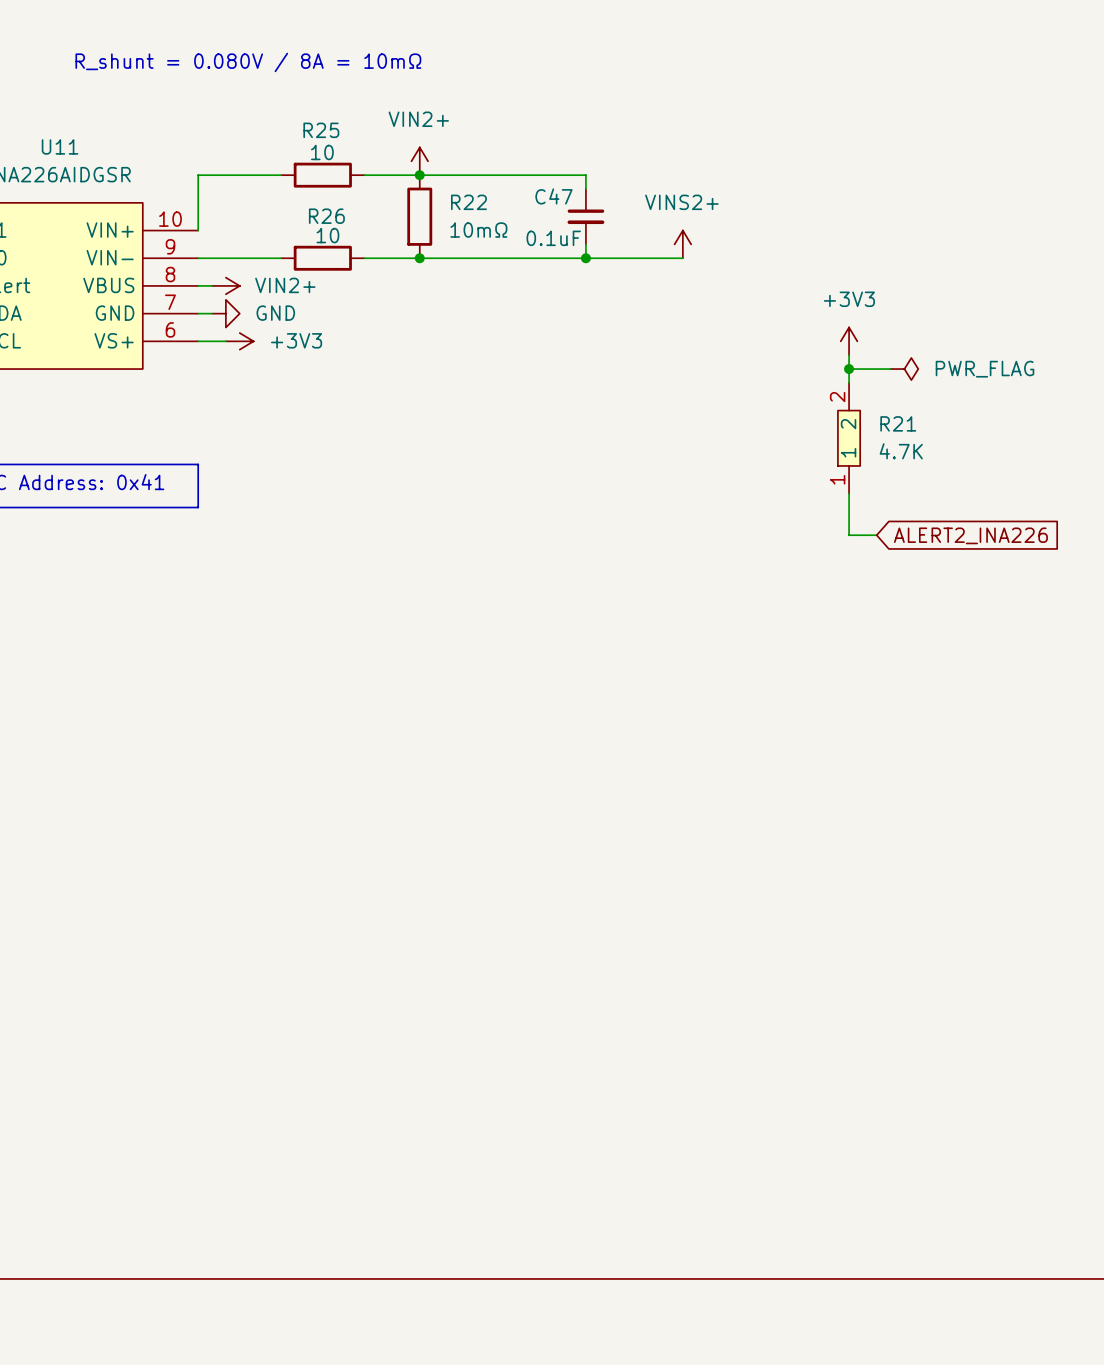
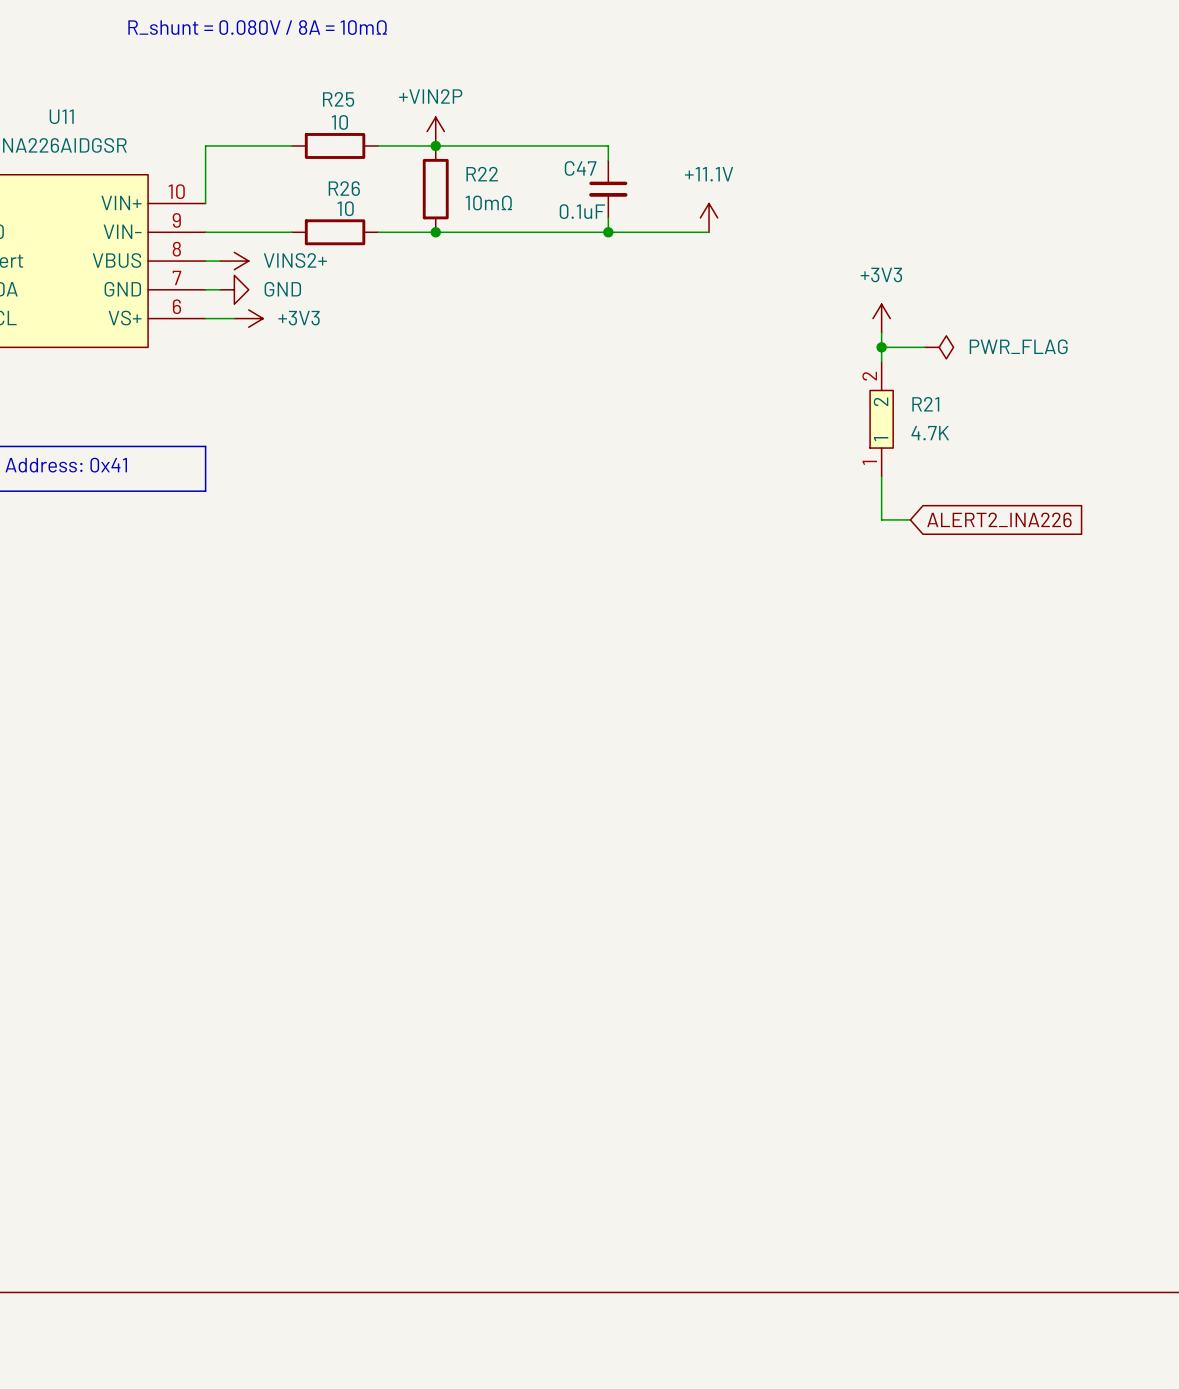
power symbol: VIN2+ (419, 161) -> +VIN2P (435, 131)
power symbol: VINS2+ (682, 244) -> +11.1V (709, 217)
power symbol: VIN2+ (225, 285) -> VINS2+ (234, 261)

